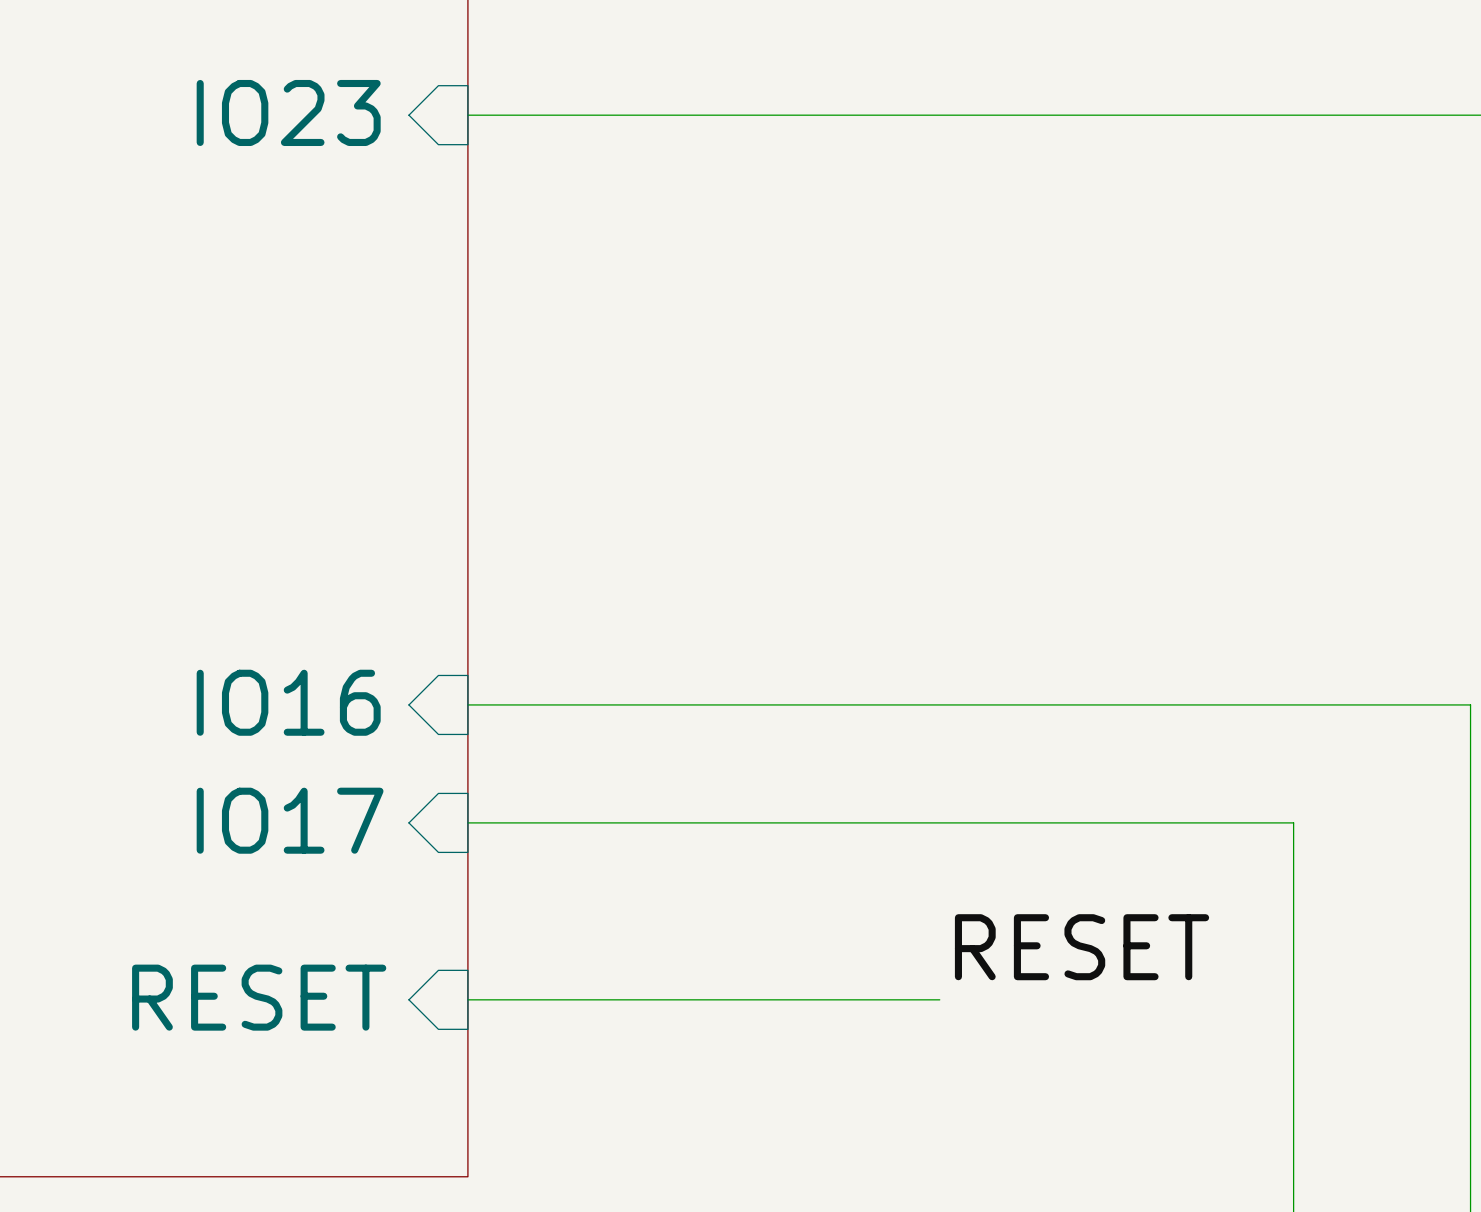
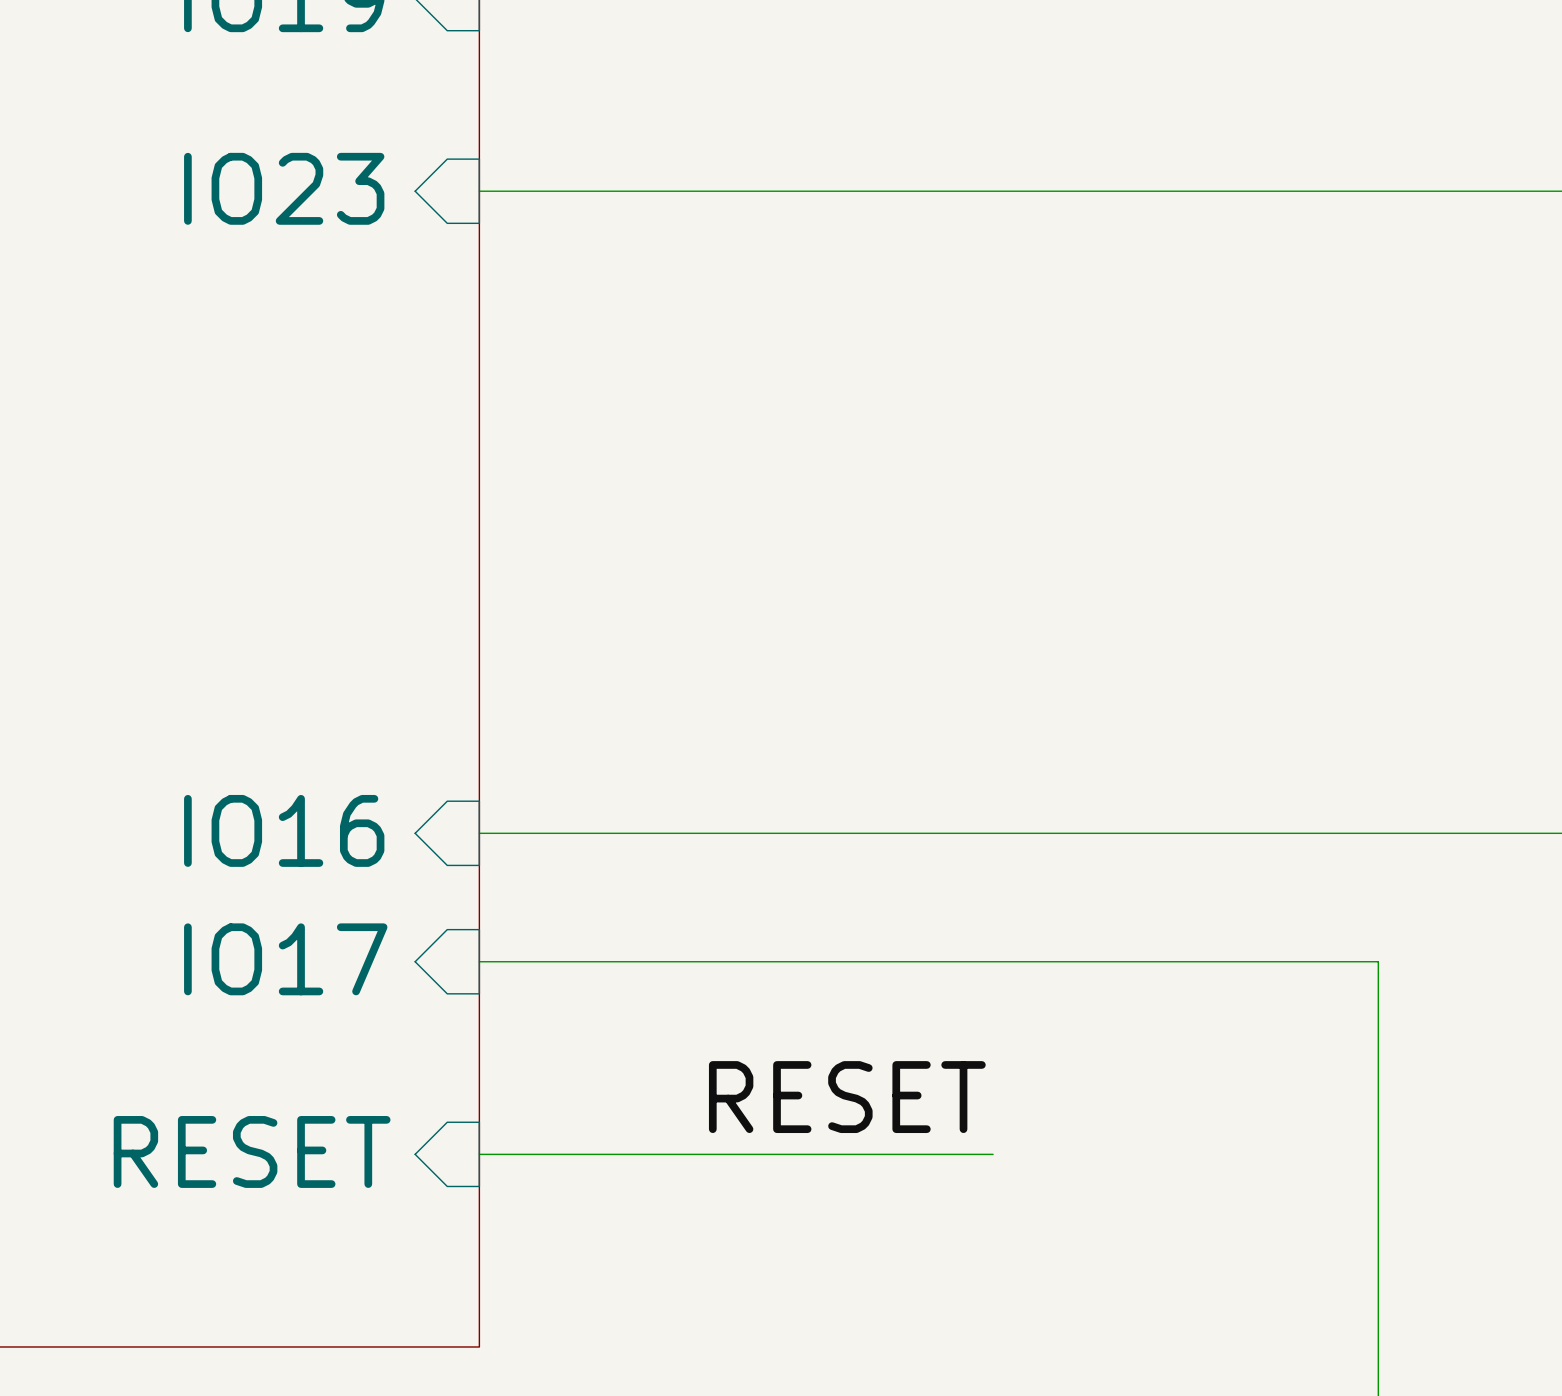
label position: RESET (1082, 947) -> RESET (847, 1097)

